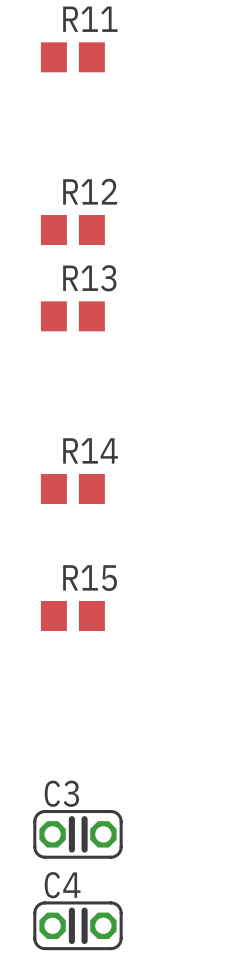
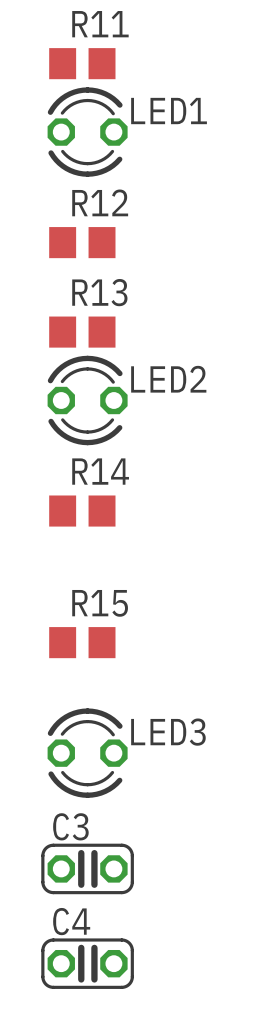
LED1: none -> (87, 132)
LED2: none -> (87, 400)
LED3: none -> (87, 753)

